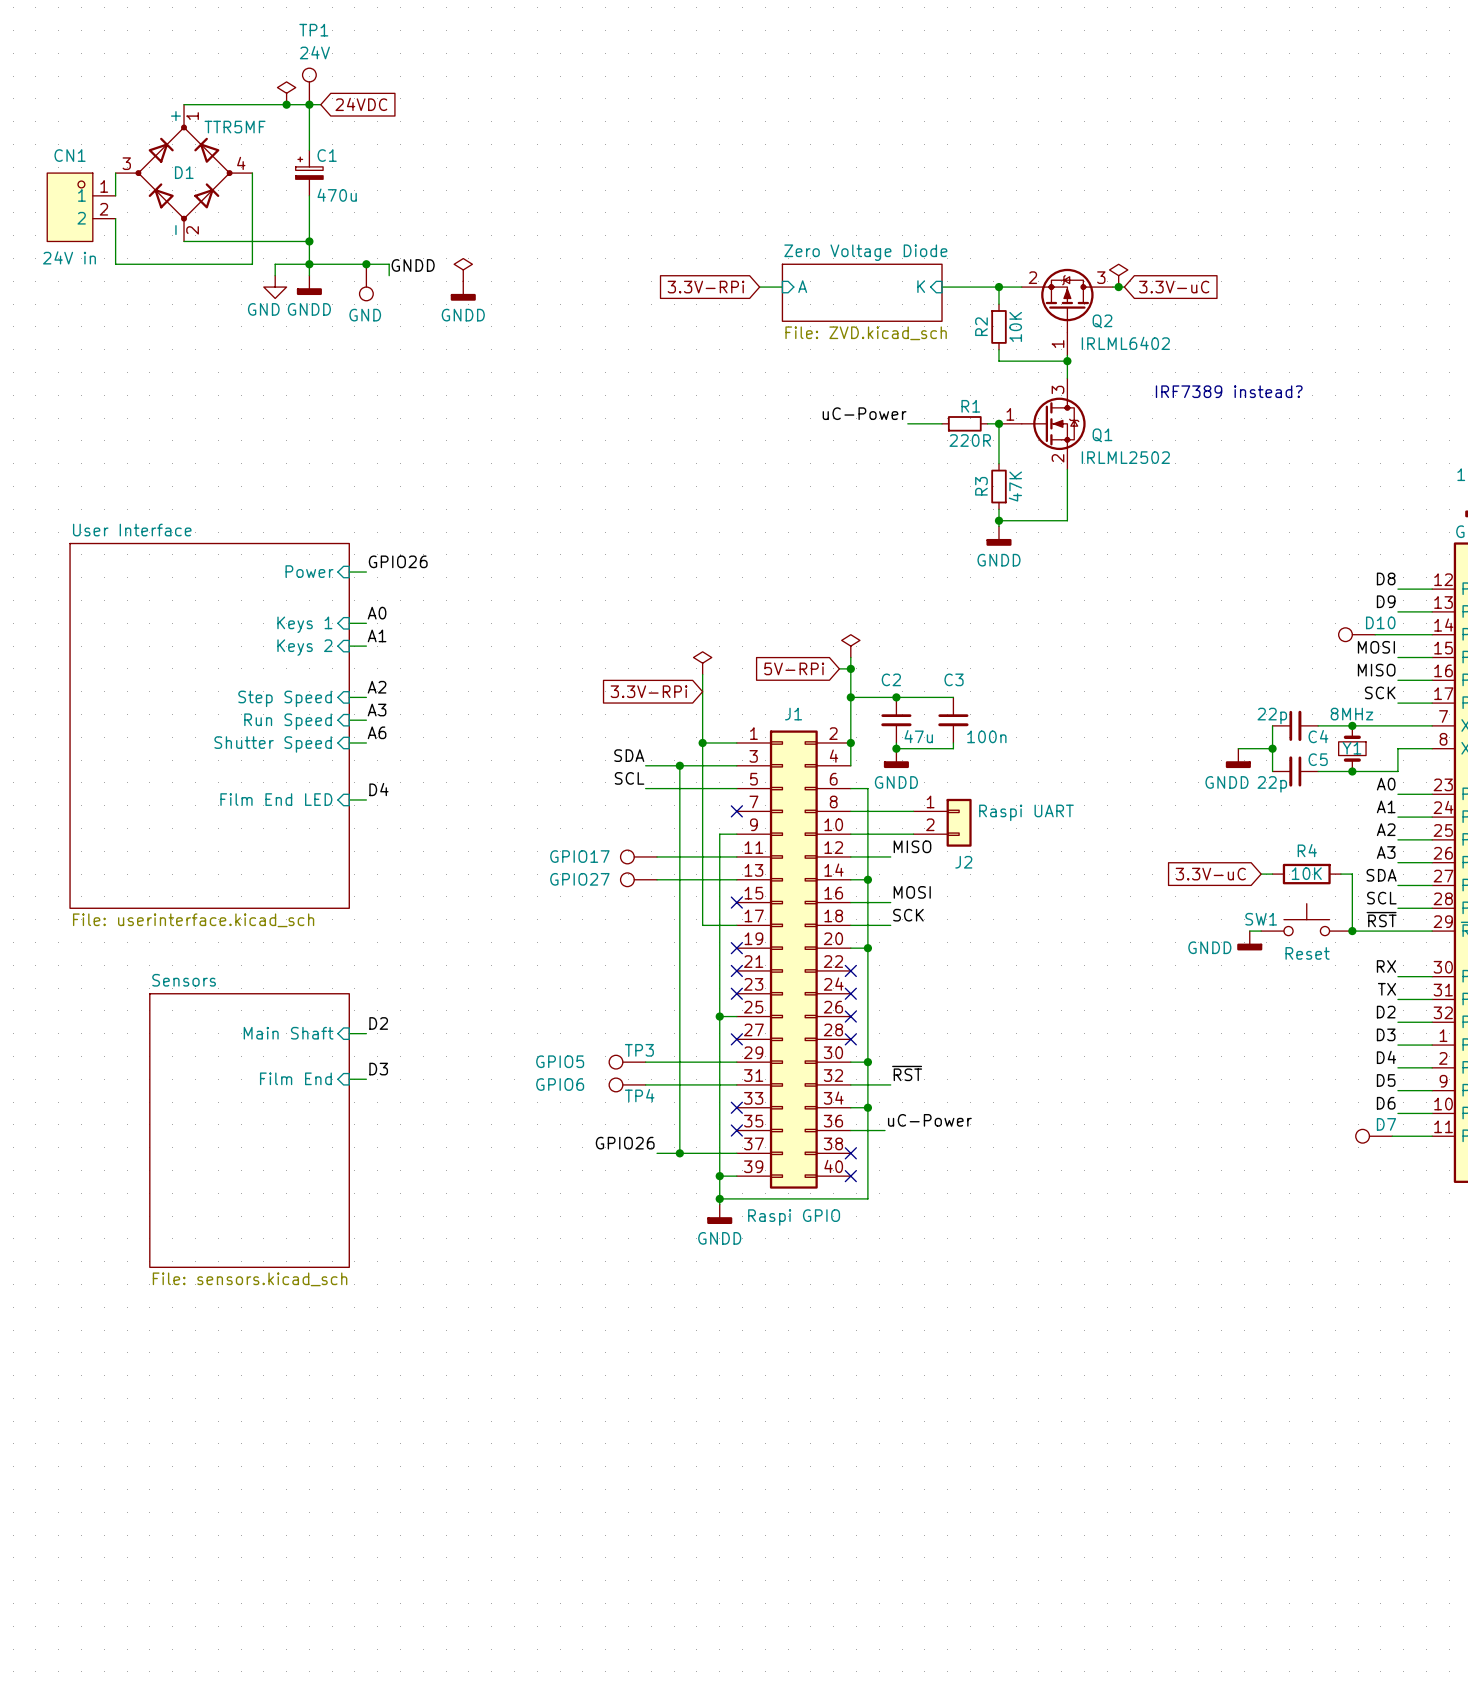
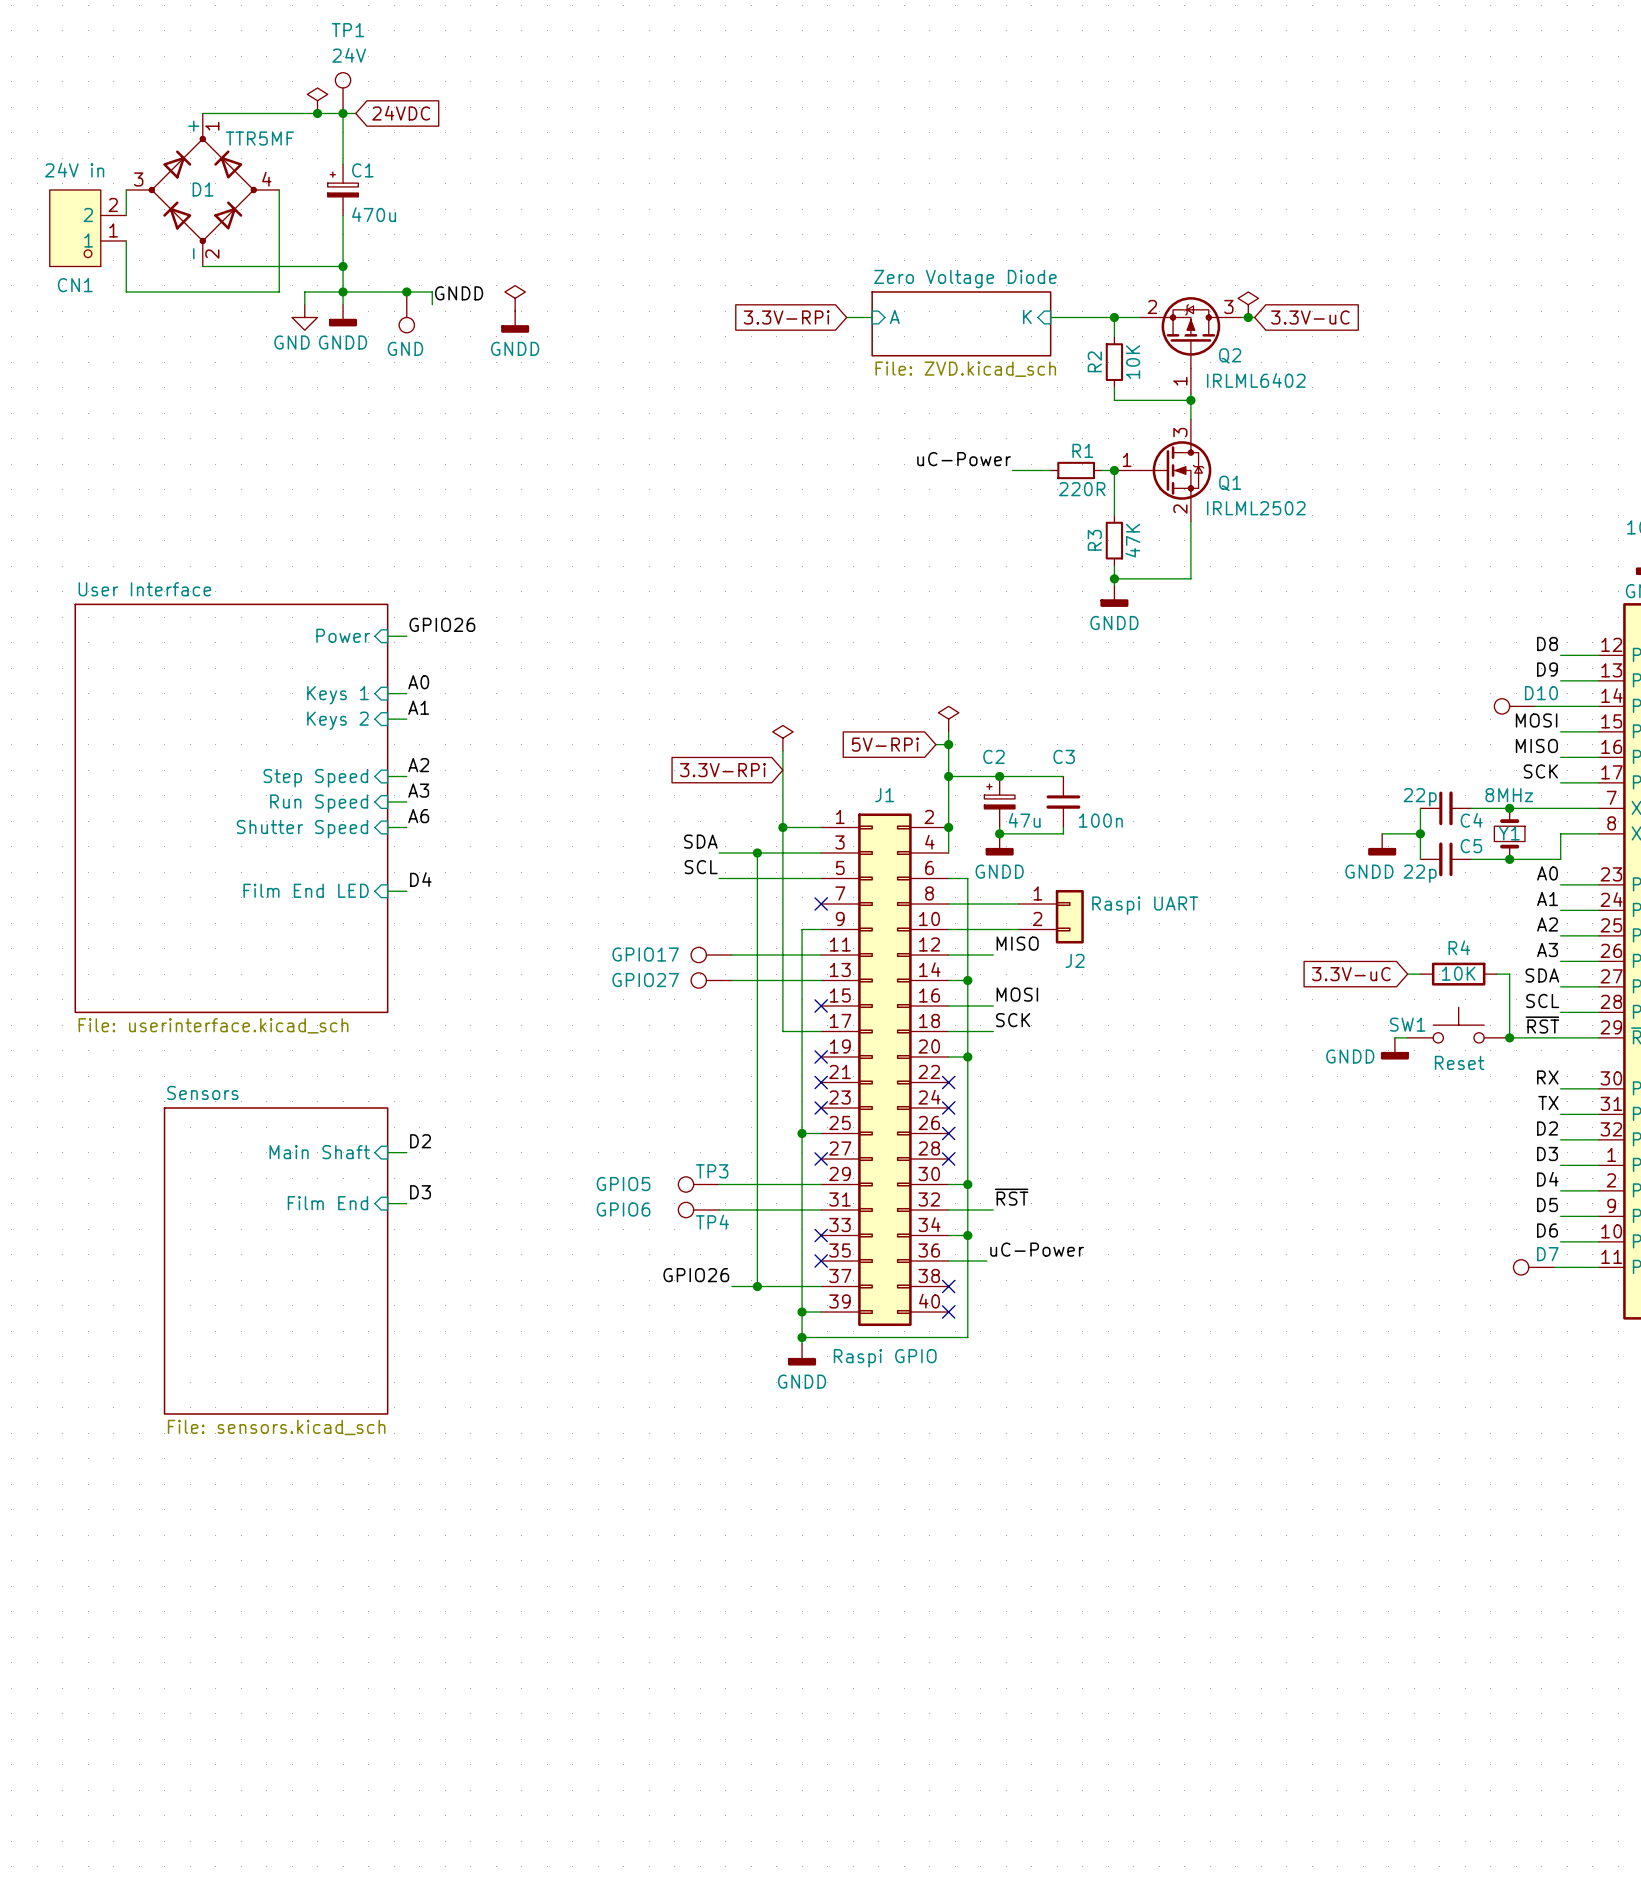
CN1 flip: as is (70, 207) -> up-down (75, 228)
text: IRF7389 instead? (1229, 391) -> none
C2 symbol: [881, 697, 912, 743] -> [984, 776, 1015, 828]

